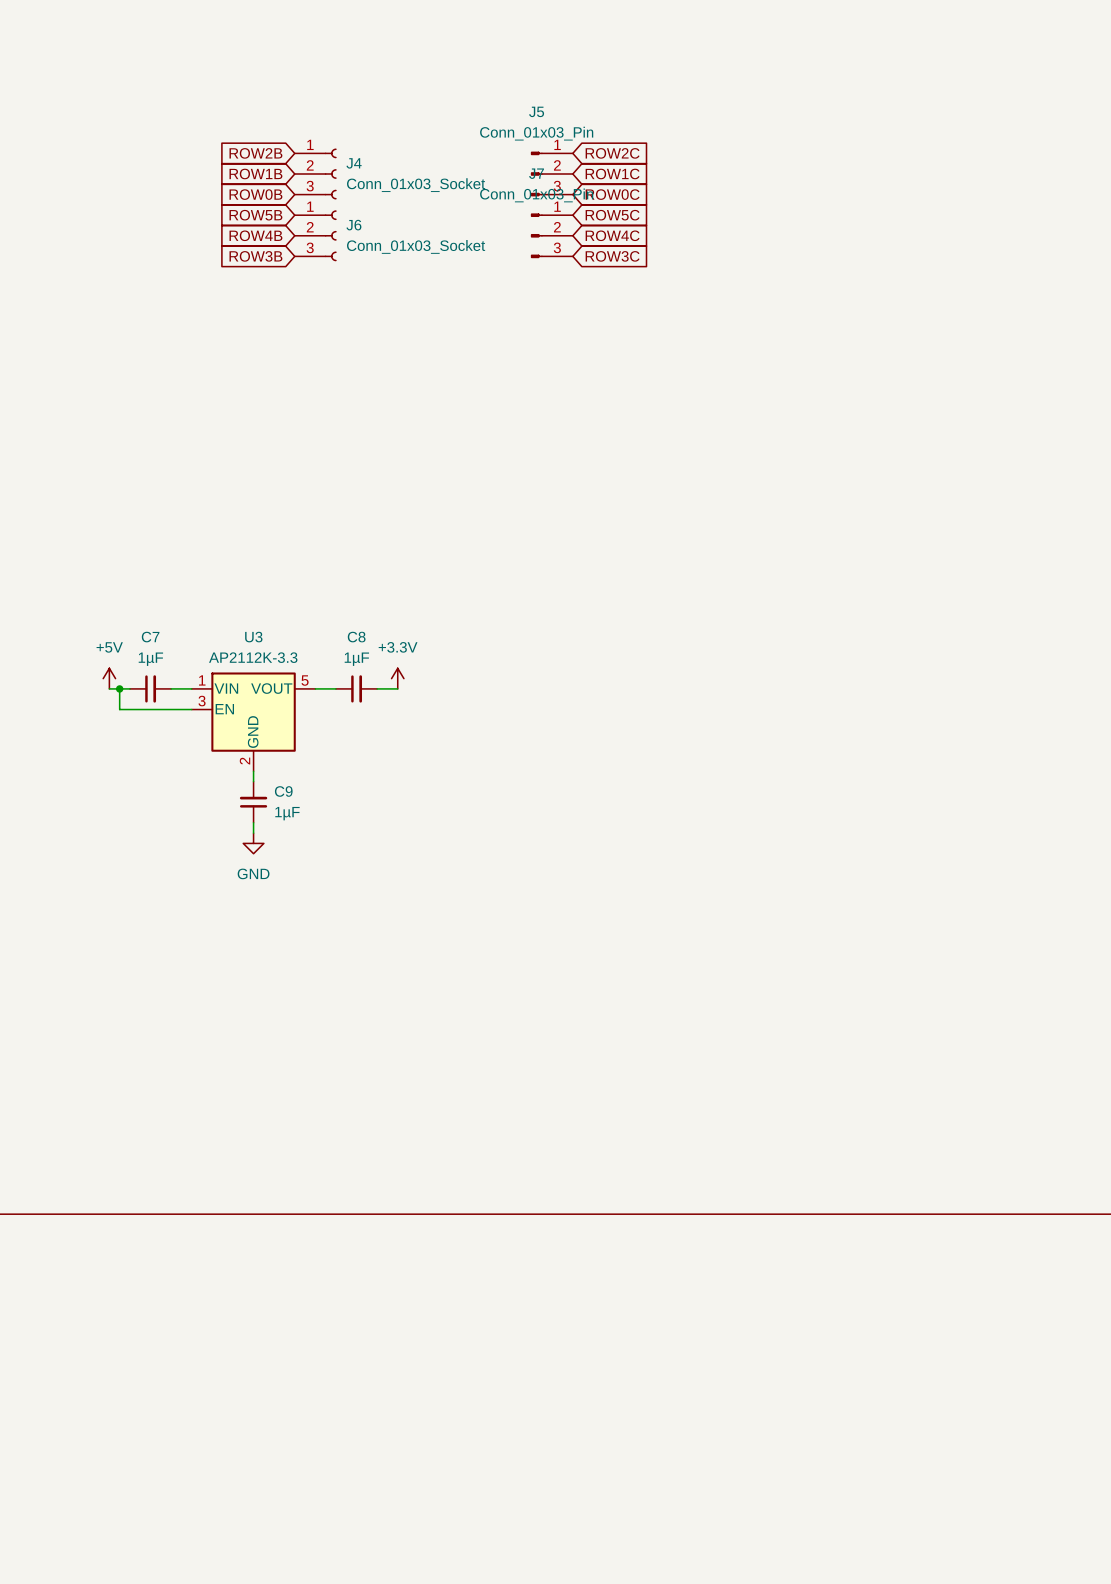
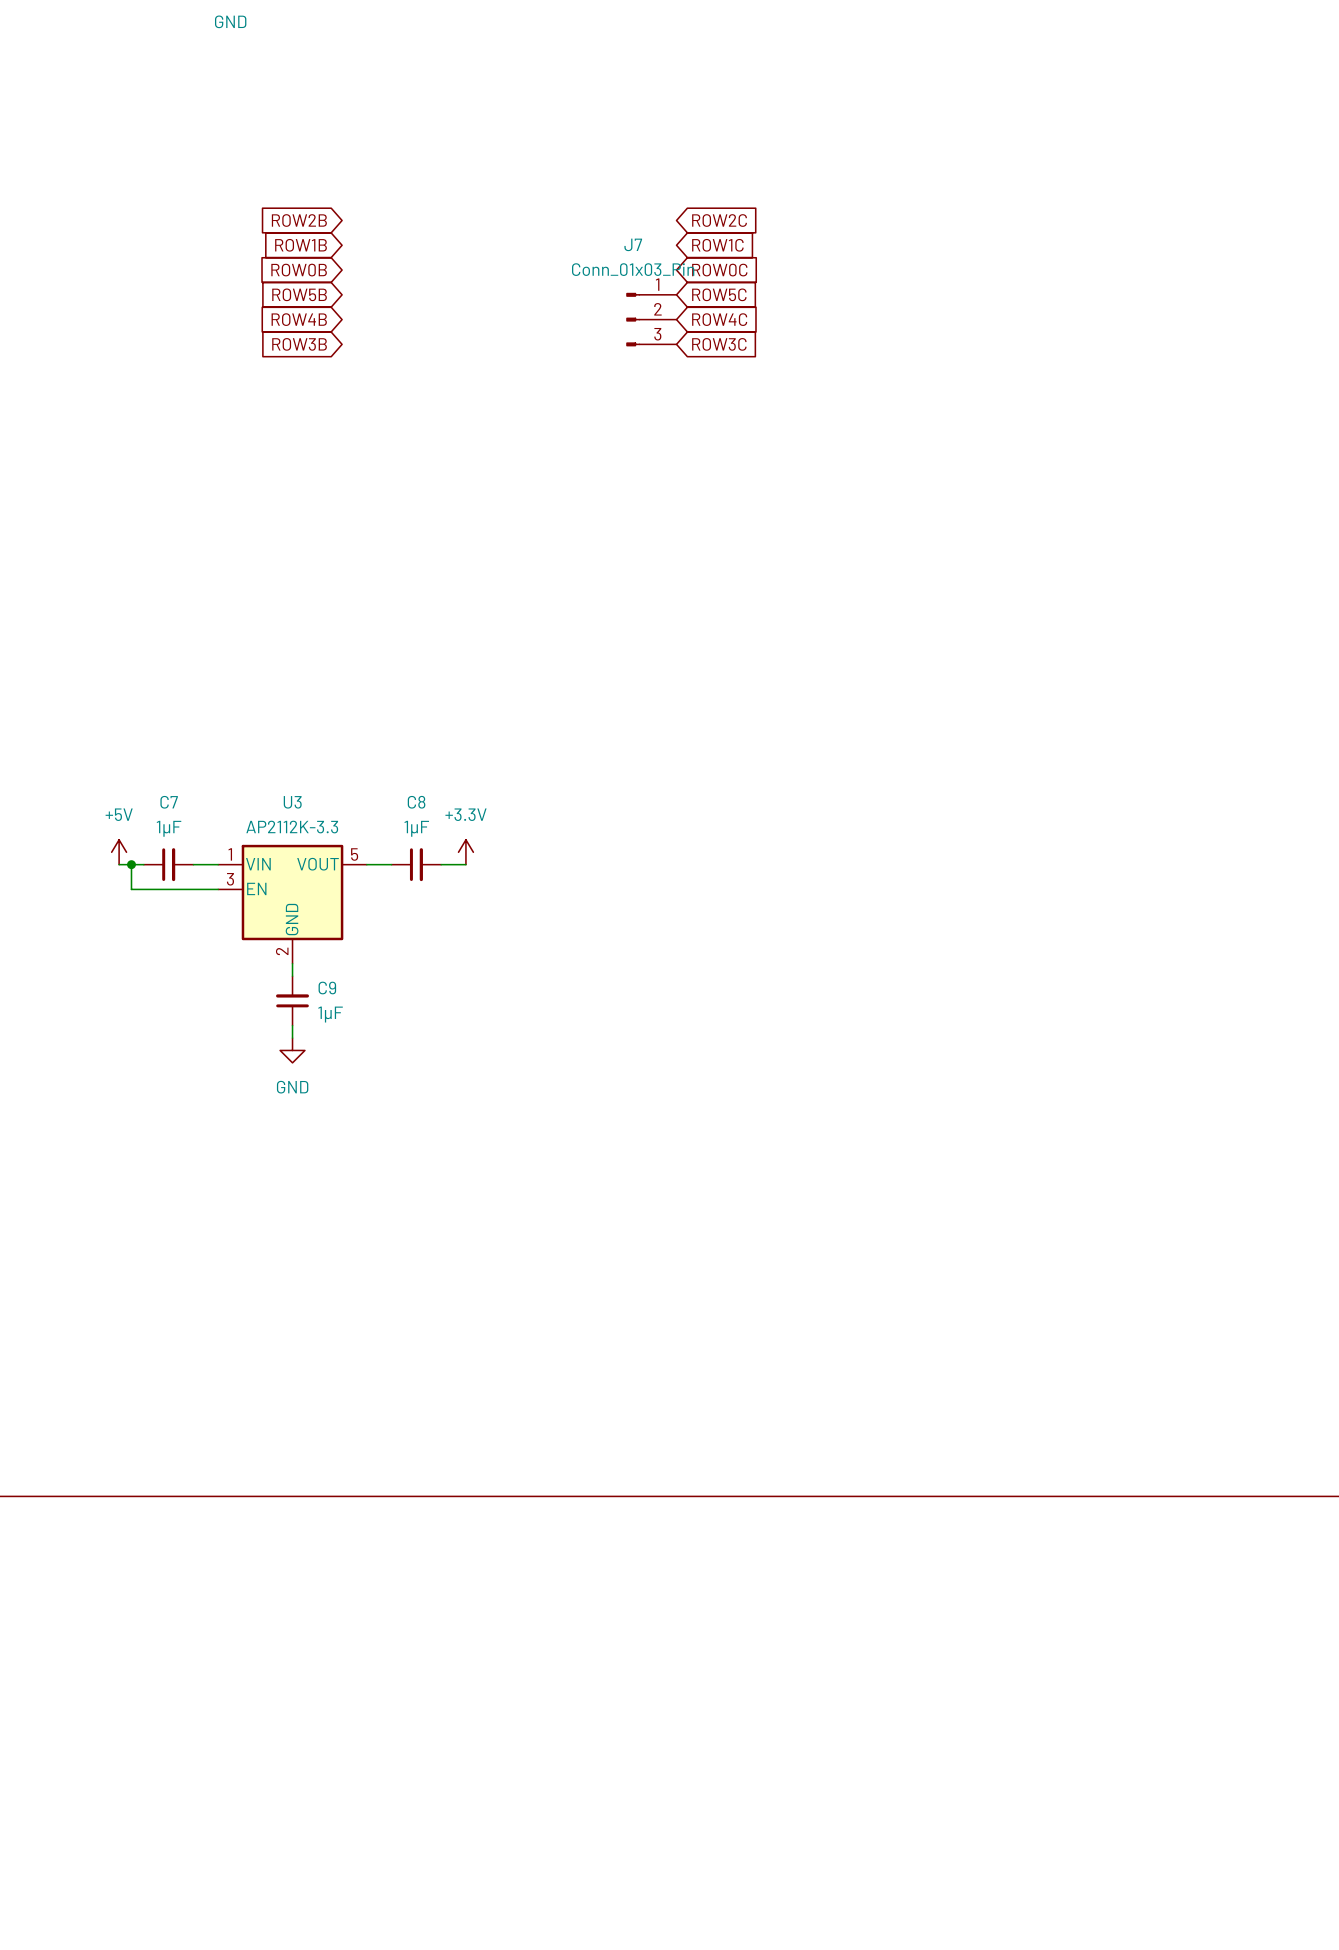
J4: Conn_01x03_Socket (315, 173) -> none
J5: Conn_01x03_Pin (551, 173) -> none
J6: Conn_01x03_Socket (315, 235) -> none

